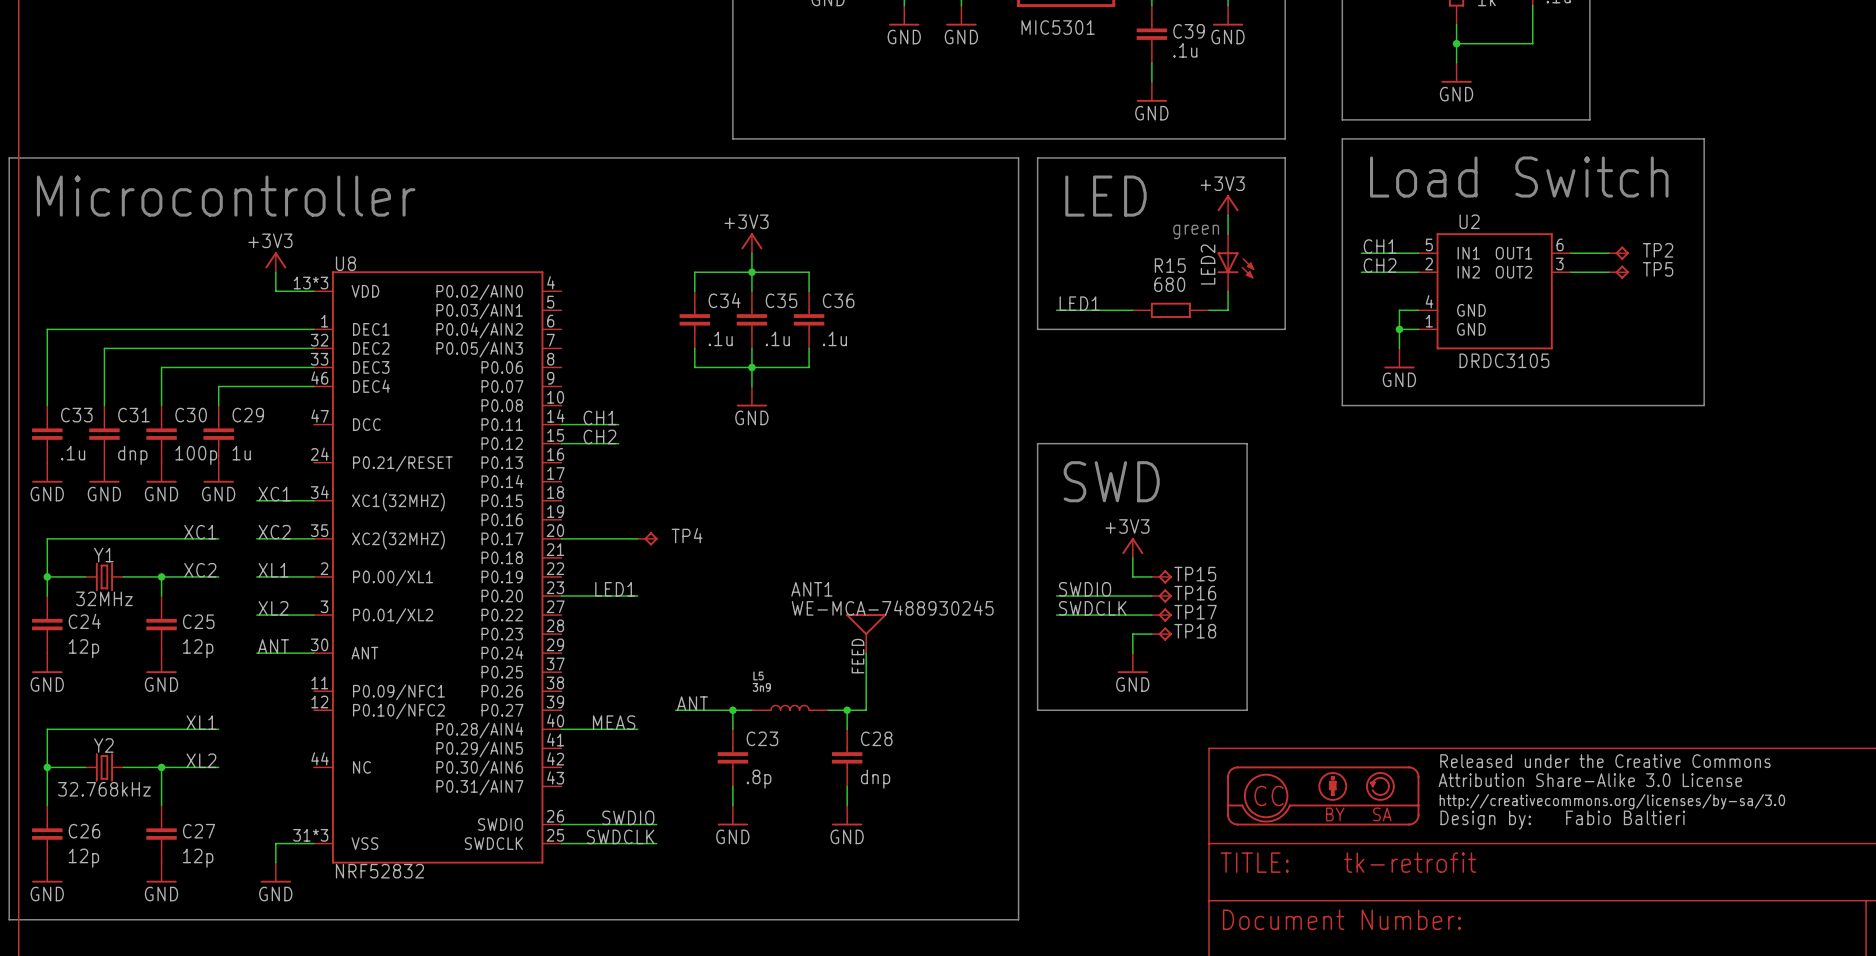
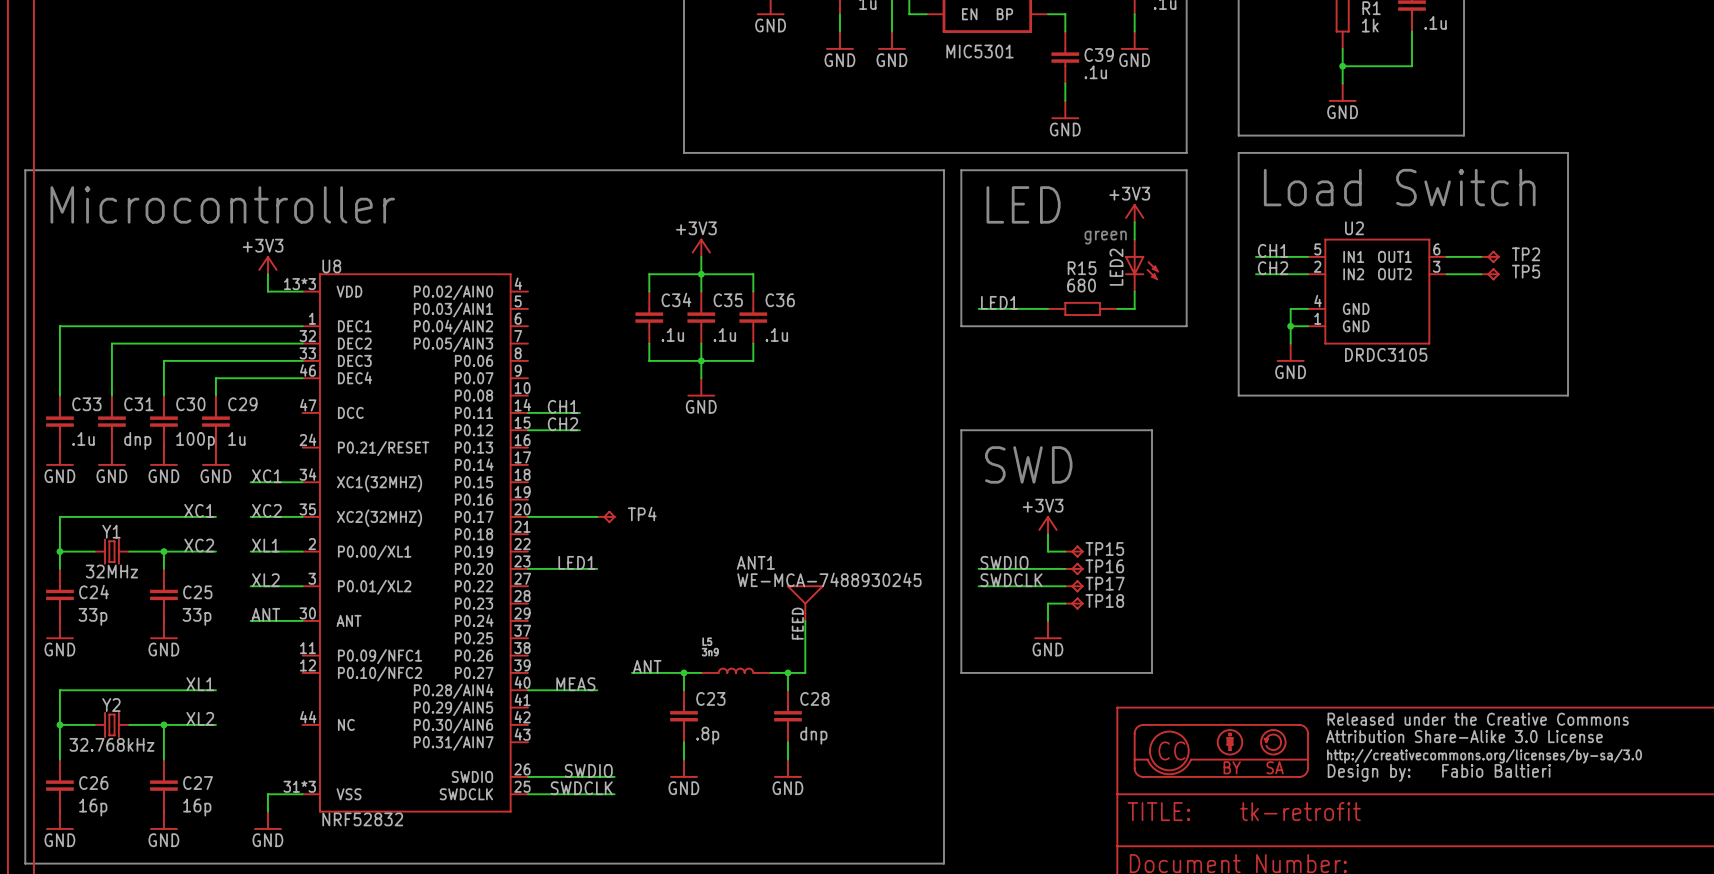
C24 value: 12p (83, 648) -> 33p (93, 616)
C25 value: 12p (198, 648) -> 33p (197, 616)
C26 value: 12p (83, 858) -> 16p (93, 807)
C27 value: 12p (198, 858) -> 16p (197, 807)

